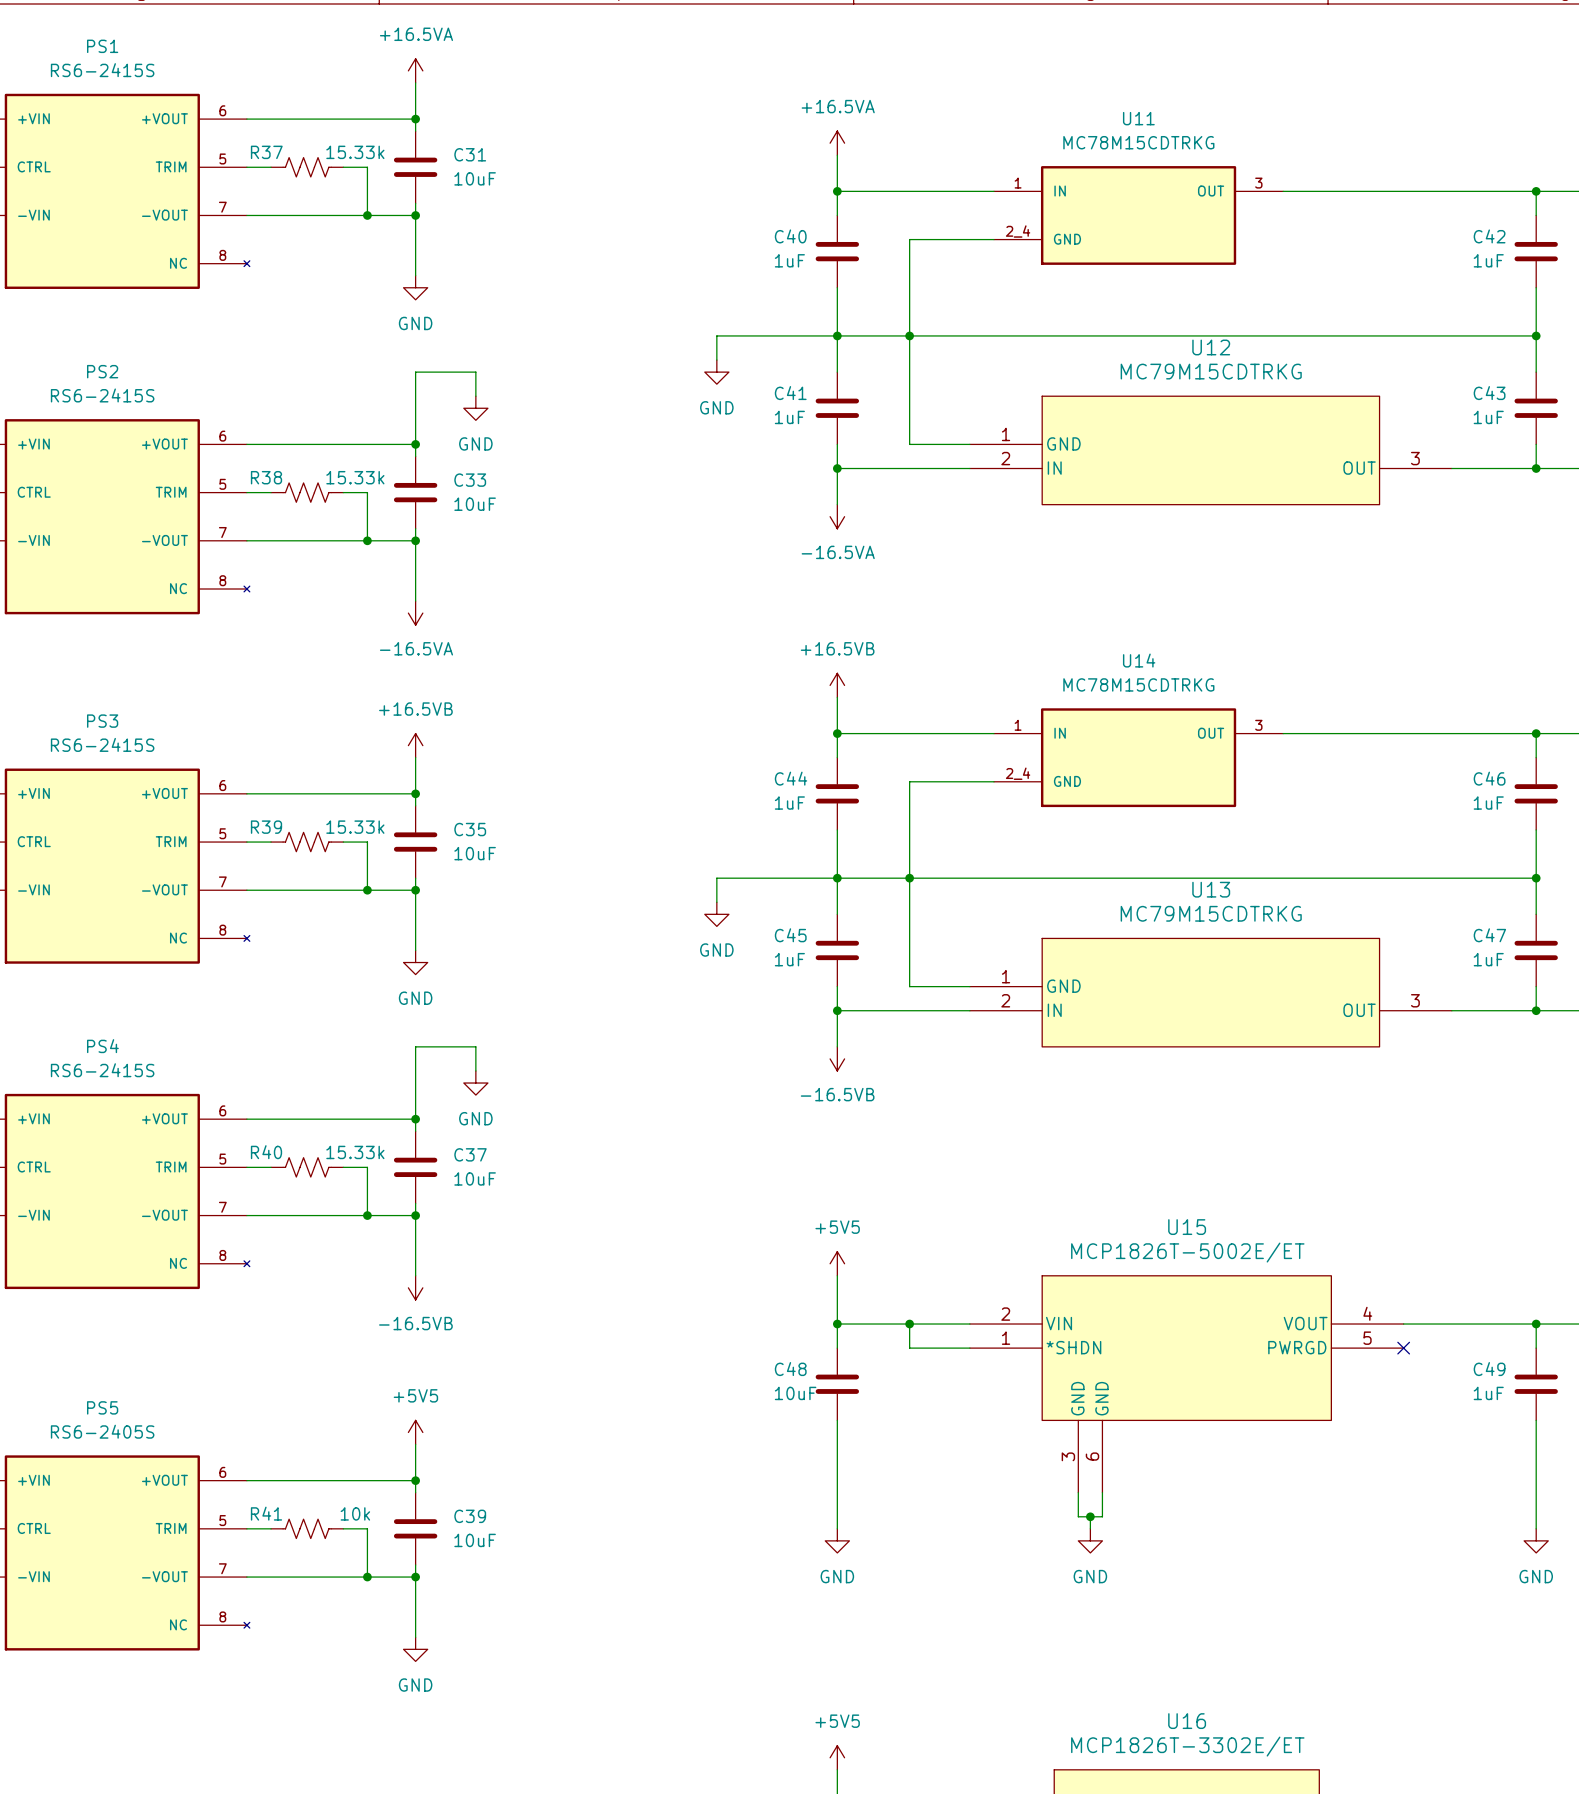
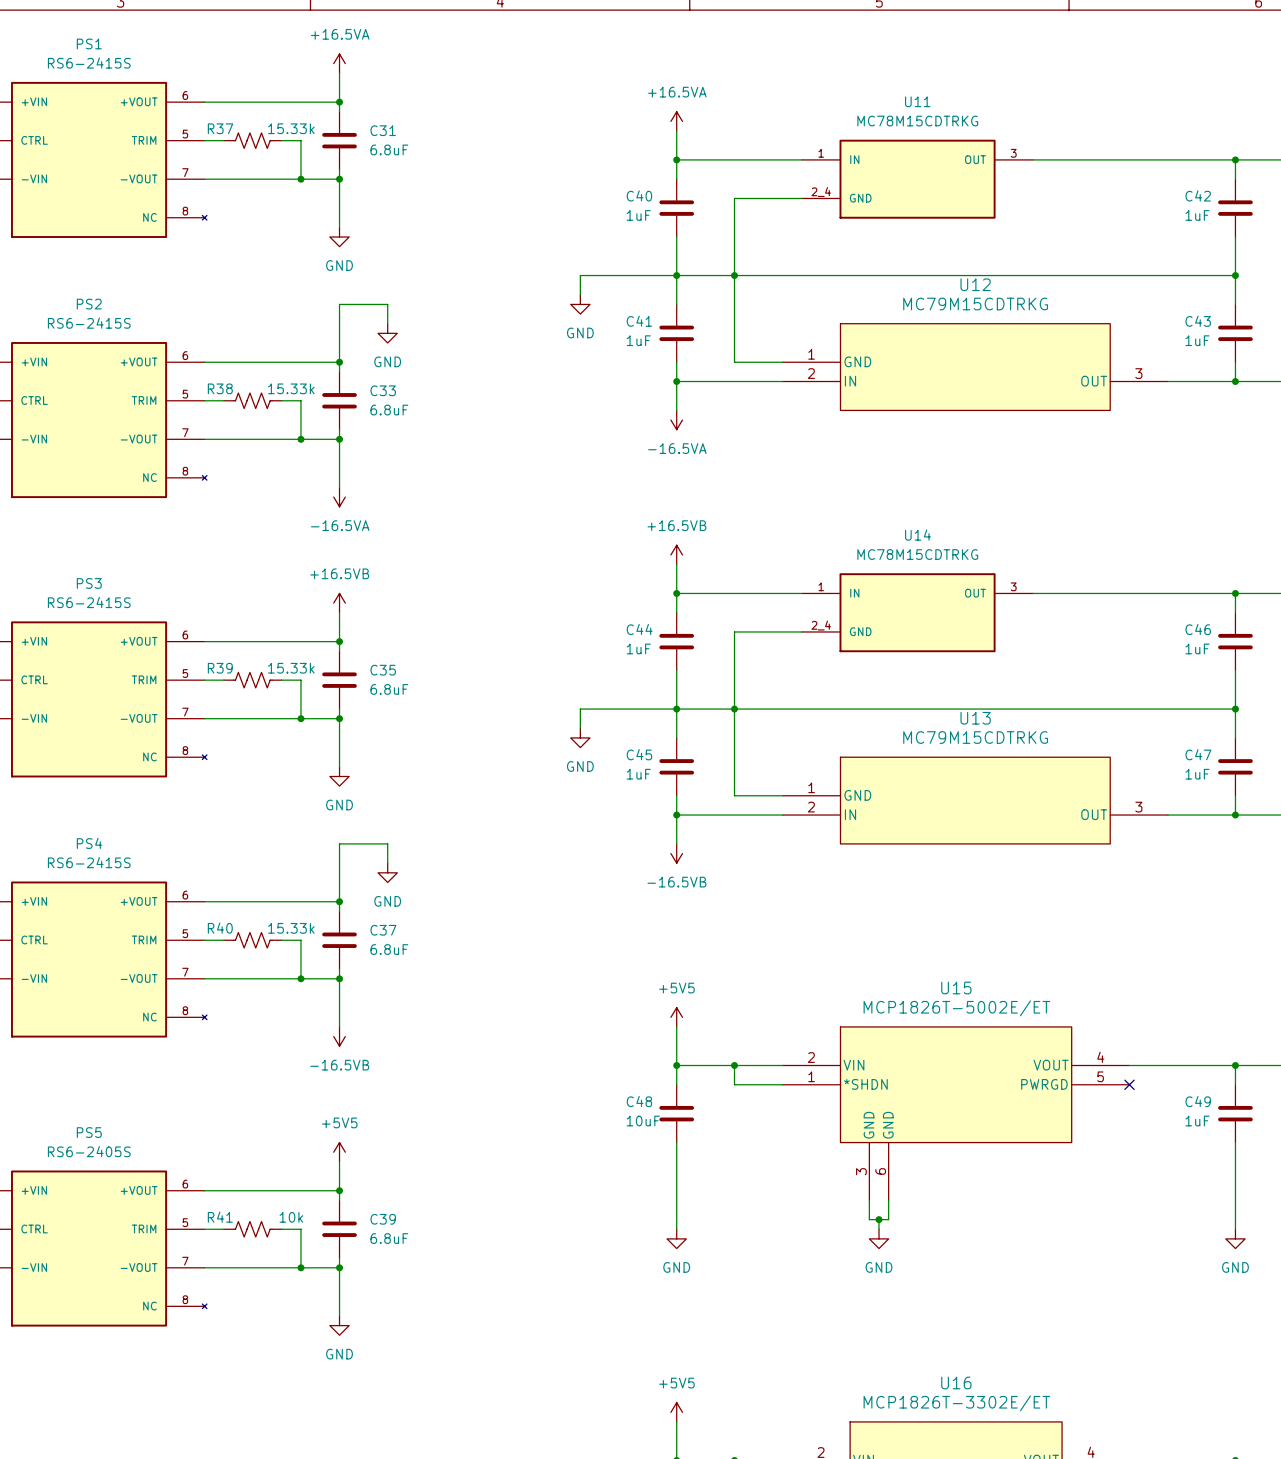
C31 value: 10uF (475, 178) -> 6.8uF (389, 149)
C33 value: 10uF (475, 504) -> 6.8uF (389, 410)
C35 value: 10uF (475, 853) -> 6.8uF (389, 689)
C37 value: 10uF (475, 1178) -> 6.8uF (389, 949)
C39 value: 10uF (475, 1540) -> 6.8uF (389, 1238)

